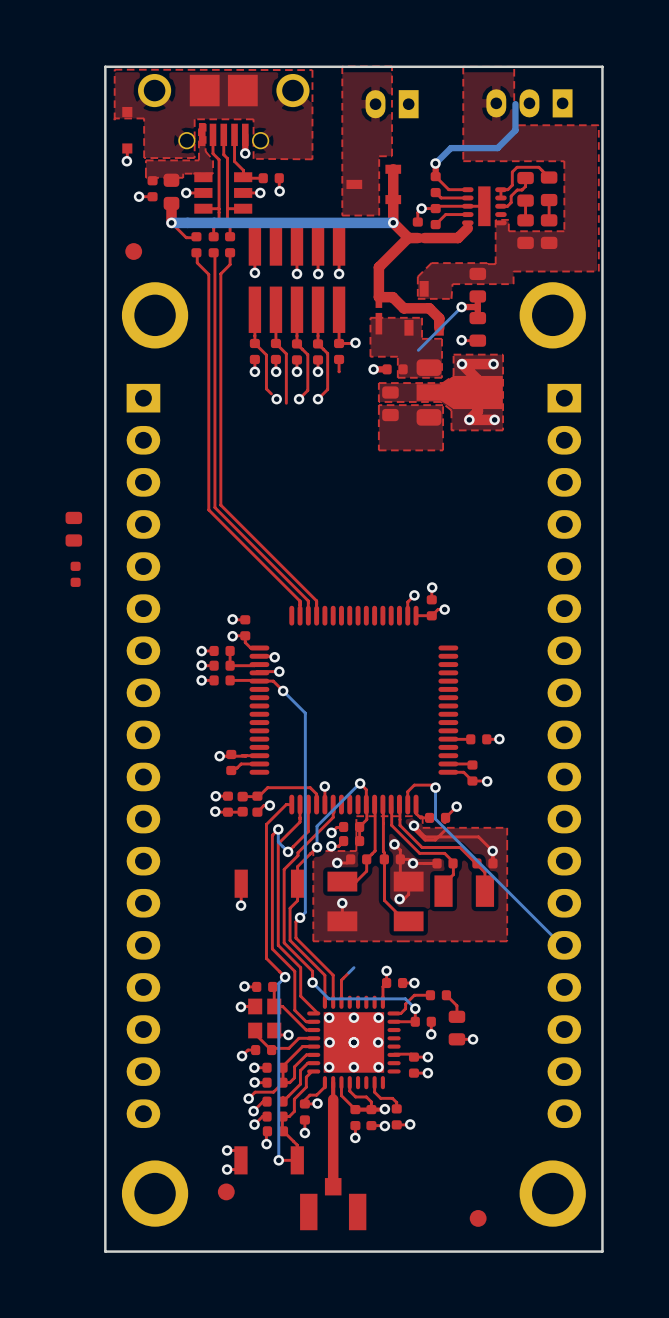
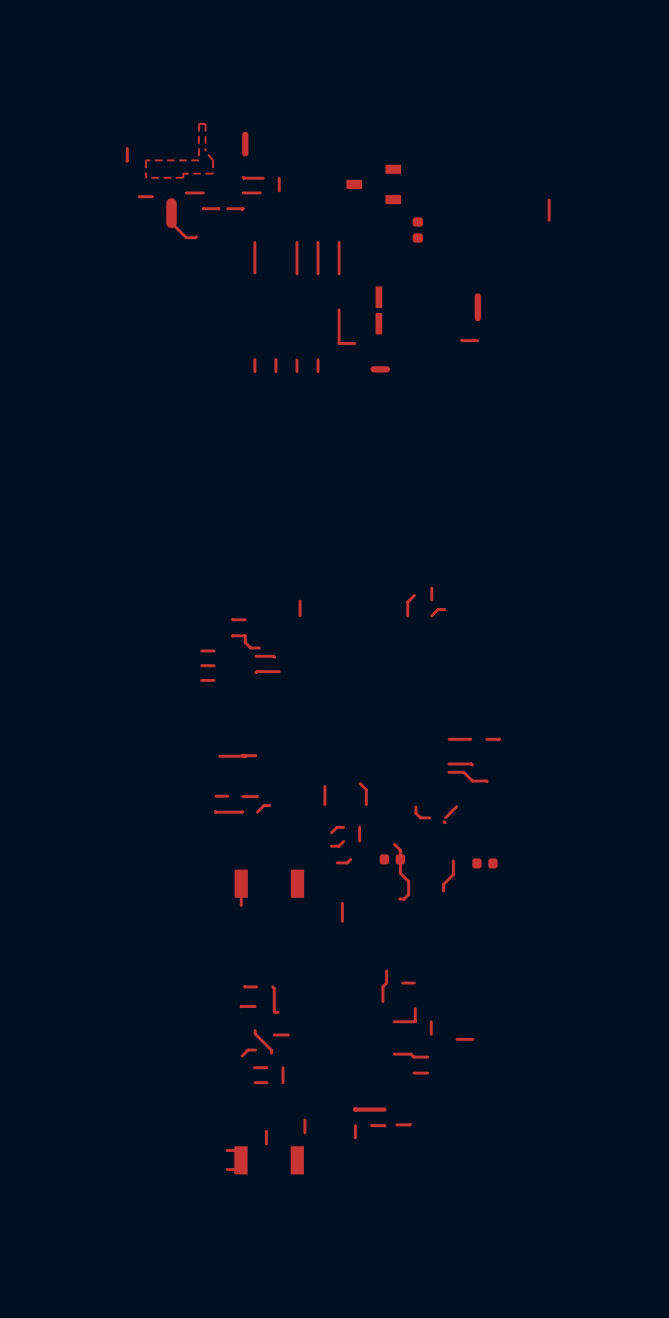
top zone outline: (392, 66) (342, 66) (342, 215) (379, 215) (379, 156) (392, 156) (392, 66) -> none
top zone outline: (514, 66) (514, 125) (598, 125) (598, 271) (513, 271) (513, 284) (452, 284) (451, 298) (417, 298) (417, 276) (431, 263) (495, 264) (495, 219) (508, 219) (508, 231) (564, 231) (564, 161) (463, 161) (463, 66) (514, 66) -> none
board edge: (602, 66) (105, 66) (105, 1251) (602, 1251) (602, 66) -> none
part: (529, 103) -> none
part: (392, 104) -> none
bottom track: (515, 104) (515, 130) (497, 148) (450, 148) (435, 163) -> none
part: (223, 111) -> none
top zone outline: (114, 118) (144, 118) (144, 158) (194, 158) (194, 119) (253, 119) (253, 158) (312, 159) (312, 70) (114, 69) (114, 120) -> none
part: (127, 130) -> none
top track: (212, 134) (212, 153) (219, 159) (219, 222) (213, 227) (213, 236) -> none
top track: (223, 134) (223, 154) (227, 158) (227, 222) (230, 224) (230, 236) -> none
top track: (234, 134) (234, 161) (243, 170) (243, 176) -> none
via: (245, 153) -> none
via: (126, 161) -> none
top track: (435, 163) (435, 176) (448, 189) (467, 189) -> none
via: (435, 163) -> none
top track: (393, 169) (393, 222) (408, 238) -> none
top track: (549, 177) (538, 167) (517, 167) (512, 172) (512, 185) (507, 189) (500, 189) (500, 197) -> none
part: (271, 178) -> none
top track: (525, 178) (525, 186) (522, 190) (517, 190) (511, 196) (511, 202) (507, 206) (500, 206) -> none
part: (435, 184) -> none
part: (152, 188) -> none
part: (549, 188) -> none
part: (525, 189) -> none
part: (171, 191) -> none
via: (279, 191) -> none
via: (186, 192) -> none
part: (223, 192) -> none
via: (260, 192) -> none
top track: (435, 192) (441, 197) (467, 197) -> none
via: (139, 196) -> none
top track: (525, 200) (525, 220) -> none
top track: (484, 206) (438, 206) (435, 208) (421, 208) (417, 212) (417, 222) -> none
part: (484, 206) -> none
via: (421, 208) -> none
top track: (467, 214) (445, 214) (435, 224) -> none
part: (435, 216) -> none
via: (171, 222) -> none
bottom track: (393, 222) (171, 222) -> none
via: (393, 222) -> none
top track: (467, 222) (467, 228) (458, 238) (424, 238) -> none
part: (525, 231) -> none
part: (549, 231) -> none
top track: (417, 238) (408, 238) (378, 267) (378, 297) (392, 297) (403, 308) (429, 308) (439, 318) (439, 327) -> none
part: (196, 244) -> none
part: (213, 244) -> none
part: (230, 244) -> none
part: (133, 251) -> none
top track: (197, 252) (197, 262) (208, 274) (208, 509) (300, 601) -> none
top track: (213, 252) (214, 507) (308, 600) (308, 615) -> none
top track: (230, 252) (230, 264) (220, 273) (220, 505) (316, 600) (316, 615) -> none
via: (254, 272) -> none
via: (296, 273) -> none
via: (339, 273) -> none
via: (318, 274) -> none
part: (296, 276) -> none
part: (477, 285) -> none
bottom track: (461, 307) (418, 350) -> none
via: (461, 307) -> none
top track: (477, 307) (461, 307) -> none
part: (424, 308) -> none
top track: (254, 309) (254, 343) (266, 355) (266, 388) (271, 393) -> none
top track: (275, 309) (275, 343) (286, 353) (286, 403) -> none
top track: (296, 309) (296, 343) (307, 354) (307, 390) (299, 399) -> none
top track: (318, 309) (318, 343) (327, 353) (327, 389) (318, 399) -> none
part: (155, 315) -> none
part: (552, 315) -> none
top zone outline: (422, 317) (370, 317) (370, 356) (397, 356) (397, 377) (442, 377) (442, 338) (422, 338) (422, 317) -> none
part: (477, 329) -> none
via: (461, 340) -> none
via: (355, 342) -> none
part: (254, 351) -> none
part: (275, 351) -> none
part: (296, 351) -> none
part: (318, 351) -> none
part: (339, 351) -> none
top zone outline: (503, 354) (453, 354) (453, 375) (443, 383) (378, 383) (378, 401) (440, 401) (451, 410) (451, 430) (503, 430) (503, 354) -> none
top track: (339, 359) (339, 371) -> none
via: (462, 364) -> none
top track: (493, 364) (462, 364) (477, 380) (477, 411) (469, 419) (494, 419) -> none
via: (493, 364) -> none
via: (373, 369) -> none
part: (395, 369) -> none
via: (254, 371) -> none
via: (276, 371) -> none
via: (296, 371) -> none
via: (317, 371) -> none
part: (459, 392) -> none
via: (276, 399) -> none
via: (299, 399) -> none
via: (318, 399) -> none
part: (390, 403) -> none
top zone outline: (443, 405) (443, 450) (378, 450) (378, 405) (443, 405) -> none
via: (469, 419) -> none
via: (494, 419) -> none
part: (73, 529) -> none
part: (75, 574) -> none
via: (432, 587) -> none
via: (414, 595) -> none
part: (431, 607) -> none
via: (444, 609) -> none
top track: (428, 615) (416, 615) -> none
via: (232, 619) -> none
part: (245, 627) -> none
via: (232, 636) -> none
part: (222, 650) -> none
top track: (230, 650) (230, 665) (255, 664) -> none
via: (201, 651) -> none
via: (274, 657) -> none
via: (201, 665) -> none
part: (222, 665) -> none
via: (279, 671) -> none
via: (201, 680) -> none
part: (222, 680) -> none
top track: (230, 680) (255, 681) -> none
top track: (259, 681) (273, 681) (283, 690) -> none
bottom track: (283, 690) (305, 713) (305, 912) (300, 917) -> none
via: (283, 690) -> none
part: (353, 710) -> none
part: (478, 739) -> none
via: (499, 739) -> none
part: (143, 755) -> none
part: (564, 755) -> none
via: (219, 756) -> none
part: (231, 762) -> none
top track: (255, 763) (241, 763) (236, 768) (229, 768) -> none
part: (472, 773) -> none
via: (487, 781) -> none
bottom track: (360, 783) (317, 826) (317, 847) -> none
via: (360, 783) -> none
via: (324, 786) -> none
bottom track: (435, 787) (435, 819) (561, 945) (564, 945) -> none
top track: (435, 787) (433, 785) (414, 785) (407, 791) (407, 804) -> none
via: (435, 787) -> none
top track: (259, 795) (267, 787) (310, 787) (316, 794) (316, 804) -> none
via: (215, 796) -> none
part: (227, 804) -> none
part: (242, 804) -> none
part: (257, 804) -> none
top track: (291, 804) (286, 804) (266, 824) (266, 958) (285, 977) -> none
top track: (300, 804) (300, 822) (278, 843) (278, 945) (300, 967) (300, 996) (317, 1013) -> none
top track: (308, 804) (308, 831) (288, 851) -> none
top track: (333, 804) (333, 817) (284, 869) (284, 942) (312, 971) (312, 982) -> none
via: (269, 805) -> none
top track: (366, 806) (366, 819) (359, 826) -> none
top track: (375, 806) (375, 850) (366, 859) (366, 871) (356, 881) (342, 881) -> none
top track: (383, 806) (384, 859) -> none
top track: (391, 806) (391, 825) (419, 853) (444, 853) (452, 861) -> none
top track: (399, 806) (399, 825) (422, 847) (460, 847) (484, 872) (484, 891) -> none
via: (456, 806) -> none
via: (215, 811) -> none
top zone outline: (422, 816) (356, 816) (356, 851) (313, 851) (313, 941) (507, 941) (507, 827) (422, 827) (422, 816) -> none
part: (437, 817) -> none
via: (414, 825) -> none
part: (351, 826) -> none
bottom track: (278, 829) (278, 842) (288, 851) -> none
top track: (278, 829) (272, 835) (272, 948) (294, 971) (294, 1010) (306, 1021) (317, 1021) -> none
via: (278, 829) -> none
top track: (445, 830) (435, 840) (425, 840) (414, 828) (414, 825) (425, 836) (478, 836) (492, 851) (492, 863) -> none
via: (331, 832) -> none
part: (351, 841) -> none
via: (394, 844) -> none
via: (331, 846) -> none
top track: (317, 847) (297, 866) (297, 900) (290, 908) (290, 940) (324, 975) (324, 1002) -> none
via: (317, 847) -> none
via: (288, 851) -> none
via: (492, 851) -> none
part: (358, 859) -> none
top track: (384, 859) (384, 900) (405, 921) (408, 921) -> none
top track: (400, 859) (409, 859) (413, 863) (437, 863) -> none
via: (337, 862) -> none
via: (413, 863) -> none
part: (445, 863) -> none
part: (464, 891) -> none
via: (399, 899) -> none
part: (375, 901) -> none
via: (342, 903) -> none
via: (241, 905) -> none
top track: (300, 917) (295, 921) (295, 937) (333, 975) (333, 1002) -> none
via: (300, 917) -> none
bottom track: (354, 967) (348, 972) -> none
via: (386, 970) -> none
top track: (348, 972) (341, 980) (341, 1002) -> none
bottom track: (285, 977) (278, 983) (278, 1160) -> none
via: (285, 977) -> none
bottom track: (312, 982) (328, 998) (405, 998) (415, 1008) -> none
via: (312, 982) -> none
part: (394, 983) -> none
via: (414, 983) -> none
via: (244, 986) -> none
part: (264, 986) -> none
top track: (430, 995) (414, 995) (405, 1004) (405, 1008) (400, 1013) (394, 1013) -> none
part: (438, 995) -> none
top track: (446, 995) (456, 1005) (456, 1016) -> none
via: (240, 1006) -> none
top track: (274, 1006) (282, 1006) (306, 1030) (317, 1030) -> none
via: (415, 1008) -> none
via: (329, 1017) -> none
via: (353, 1017) -> none
via: (378, 1017) -> none
part: (264, 1018) -> none
part: (423, 1021) -> none
part: (456, 1028) -> none
via: (288, 1034) -> none
via: (431, 1034) -> none
top track: (317, 1038) (298, 1038) (288, 1048) (274, 1048) (270, 1052) -> none
via: (473, 1039) -> none
via: (329, 1042) -> none
part: (353, 1042) -> none
via: (353, 1042) -> none
via: (378, 1042) -> none
top track: (317, 1046) (302, 1046) (283, 1066) -> none
part: (263, 1050) -> none
top track: (317, 1054) (306, 1054) (294, 1066) (294, 1077) (289, 1082) (283, 1082) (273, 1092) (255, 1092) (248, 1098) -> none
via: (242, 1056) -> none
via: (427, 1057) -> none
top track: (310, 1063) (307, 1063) (300, 1070) (300, 1084) (283, 1101) (283, 1097) -> none
part: (413, 1065) -> none
via: (254, 1067) -> none
part: (275, 1067) -> none
via: (329, 1067) -> none
via: (353, 1067) -> none
via: (378, 1067) -> none
top track: (318, 1071) (311, 1071) (306, 1077) (306, 1087) (294, 1099) (294, 1111) (289, 1116) (282, 1117) (282, 1131) -> none
via: (427, 1073) -> none
via: (254, 1082) -> none
part: (275, 1082) -> none
top track: (324, 1082) (324, 1086) (316, 1095) (309, 1095) (304, 1100) (304, 1103) (317, 1103) -> none
top track: (333, 1082) (333, 1186) -> none
top track: (341, 1082) (341, 1095) (355, 1109) -> none
top track: (349, 1082) (349, 1091) (355, 1096) (366, 1096) (371, 1101) (371, 1109) -> none
top track: (374, 1082) (374, 1092) (380, 1098) (392, 1098) (396, 1102) (396, 1108) -> none
via: (248, 1098) -> none
top track: (267, 1101) (263, 1101) (253, 1111) -> none
part: (275, 1101) -> none
via: (317, 1103) -> none
via: (384, 1109) -> none
via: (253, 1111) -> none
part: (304, 1111) -> none
top track: (267, 1116) (262, 1116) (254, 1124) -> none
part: (275, 1116) -> none
part: (396, 1116) -> none
part: (355, 1117) -> none
part: (371, 1117) -> none
via: (254, 1124) -> none
via: (410, 1124) -> none
via: (384, 1126) -> none
part: (275, 1131) -> none
top track: (283, 1131) (297, 1145) (297, 1160) (278, 1160) -> none
via: (304, 1132) -> none
via: (355, 1137) -> none
via: (266, 1144) -> none
via: (227, 1150) -> none
via: (278, 1160) -> none
via: (227, 1169) -> none
part: (226, 1191) -> none
part: (155, 1193) -> none
part: (552, 1193) -> none
part: (333, 1204) -> none
part: (478, 1218) -> none

